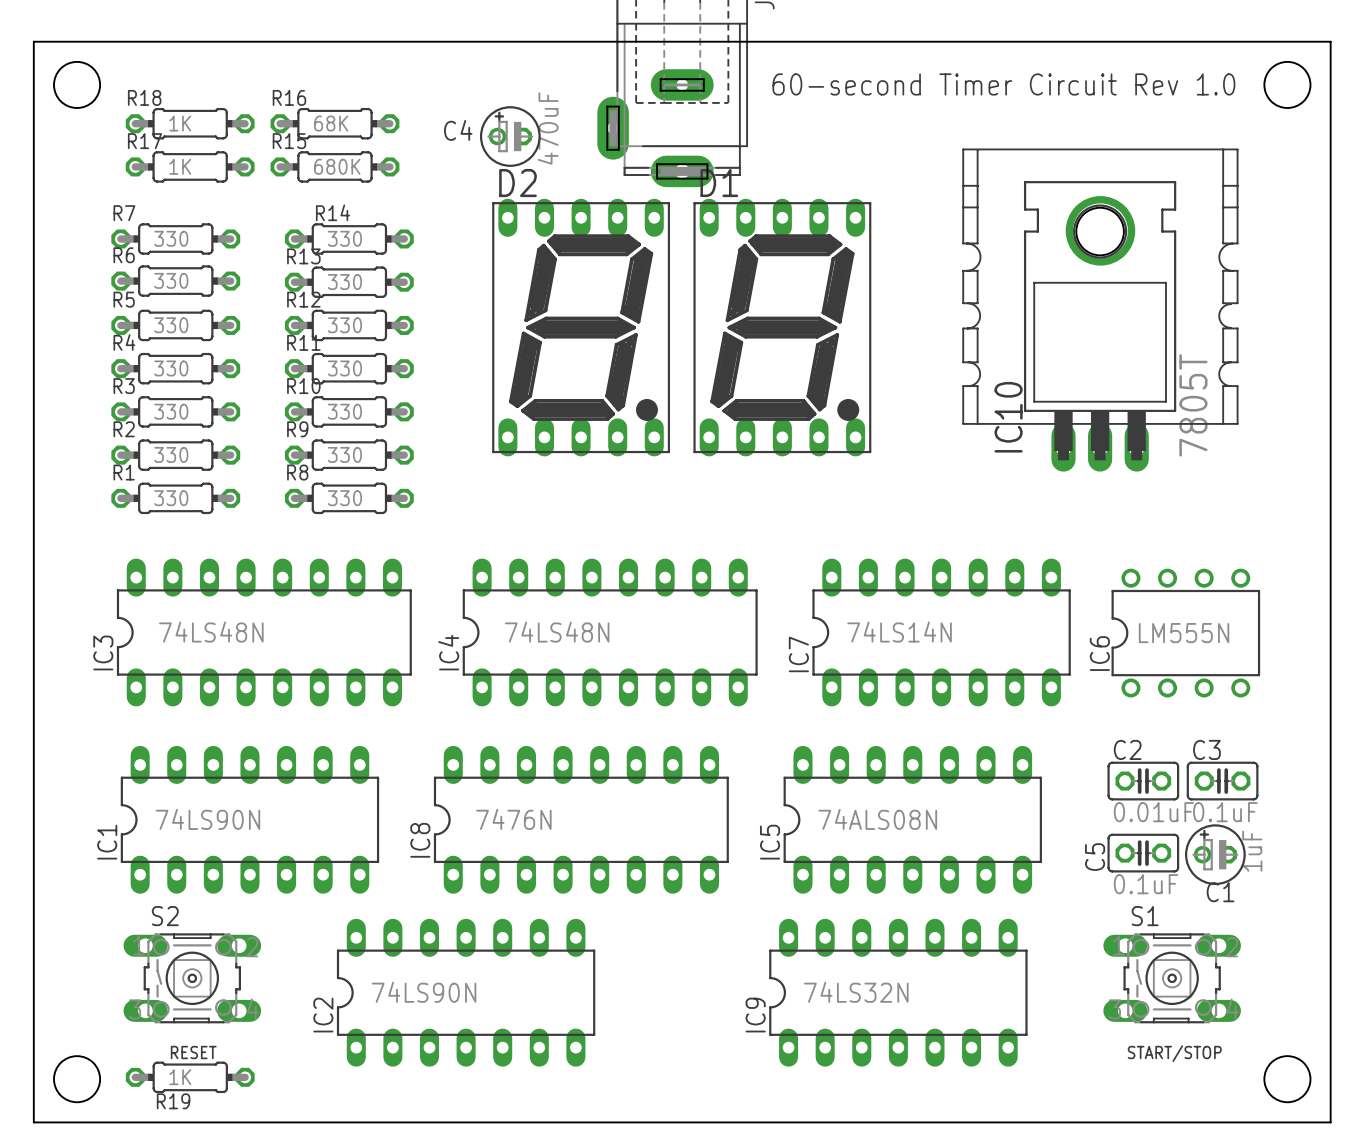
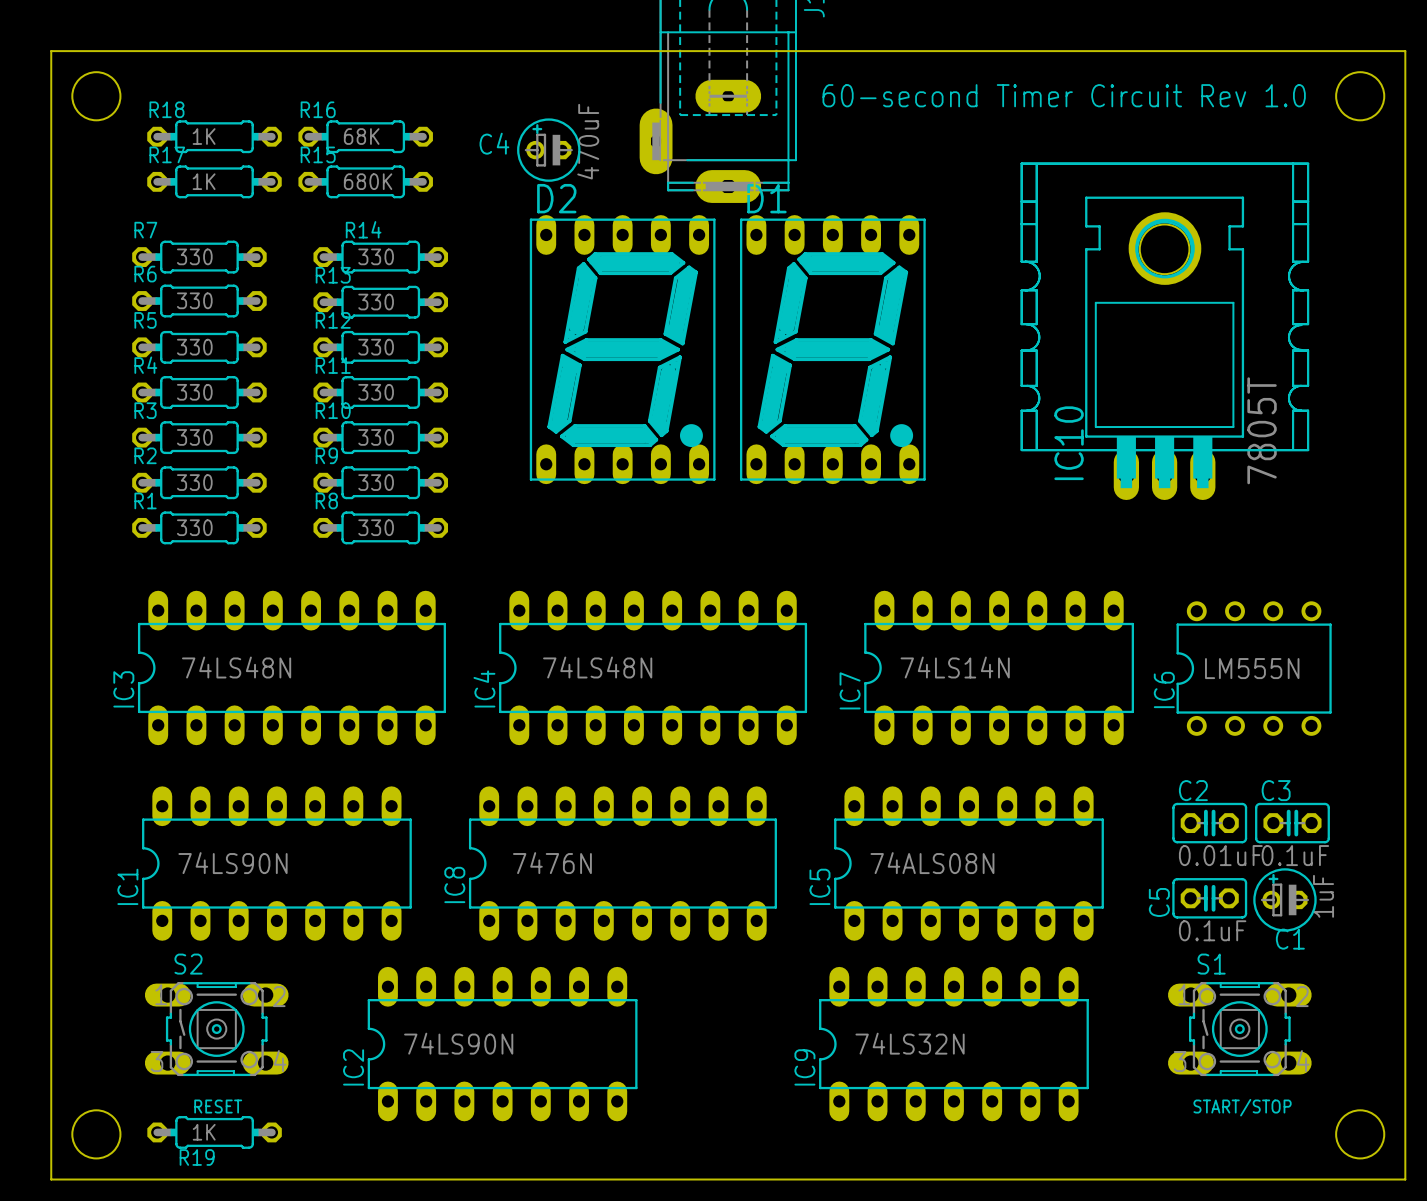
drawing: none -> [1020, 162, 1310, 452]

